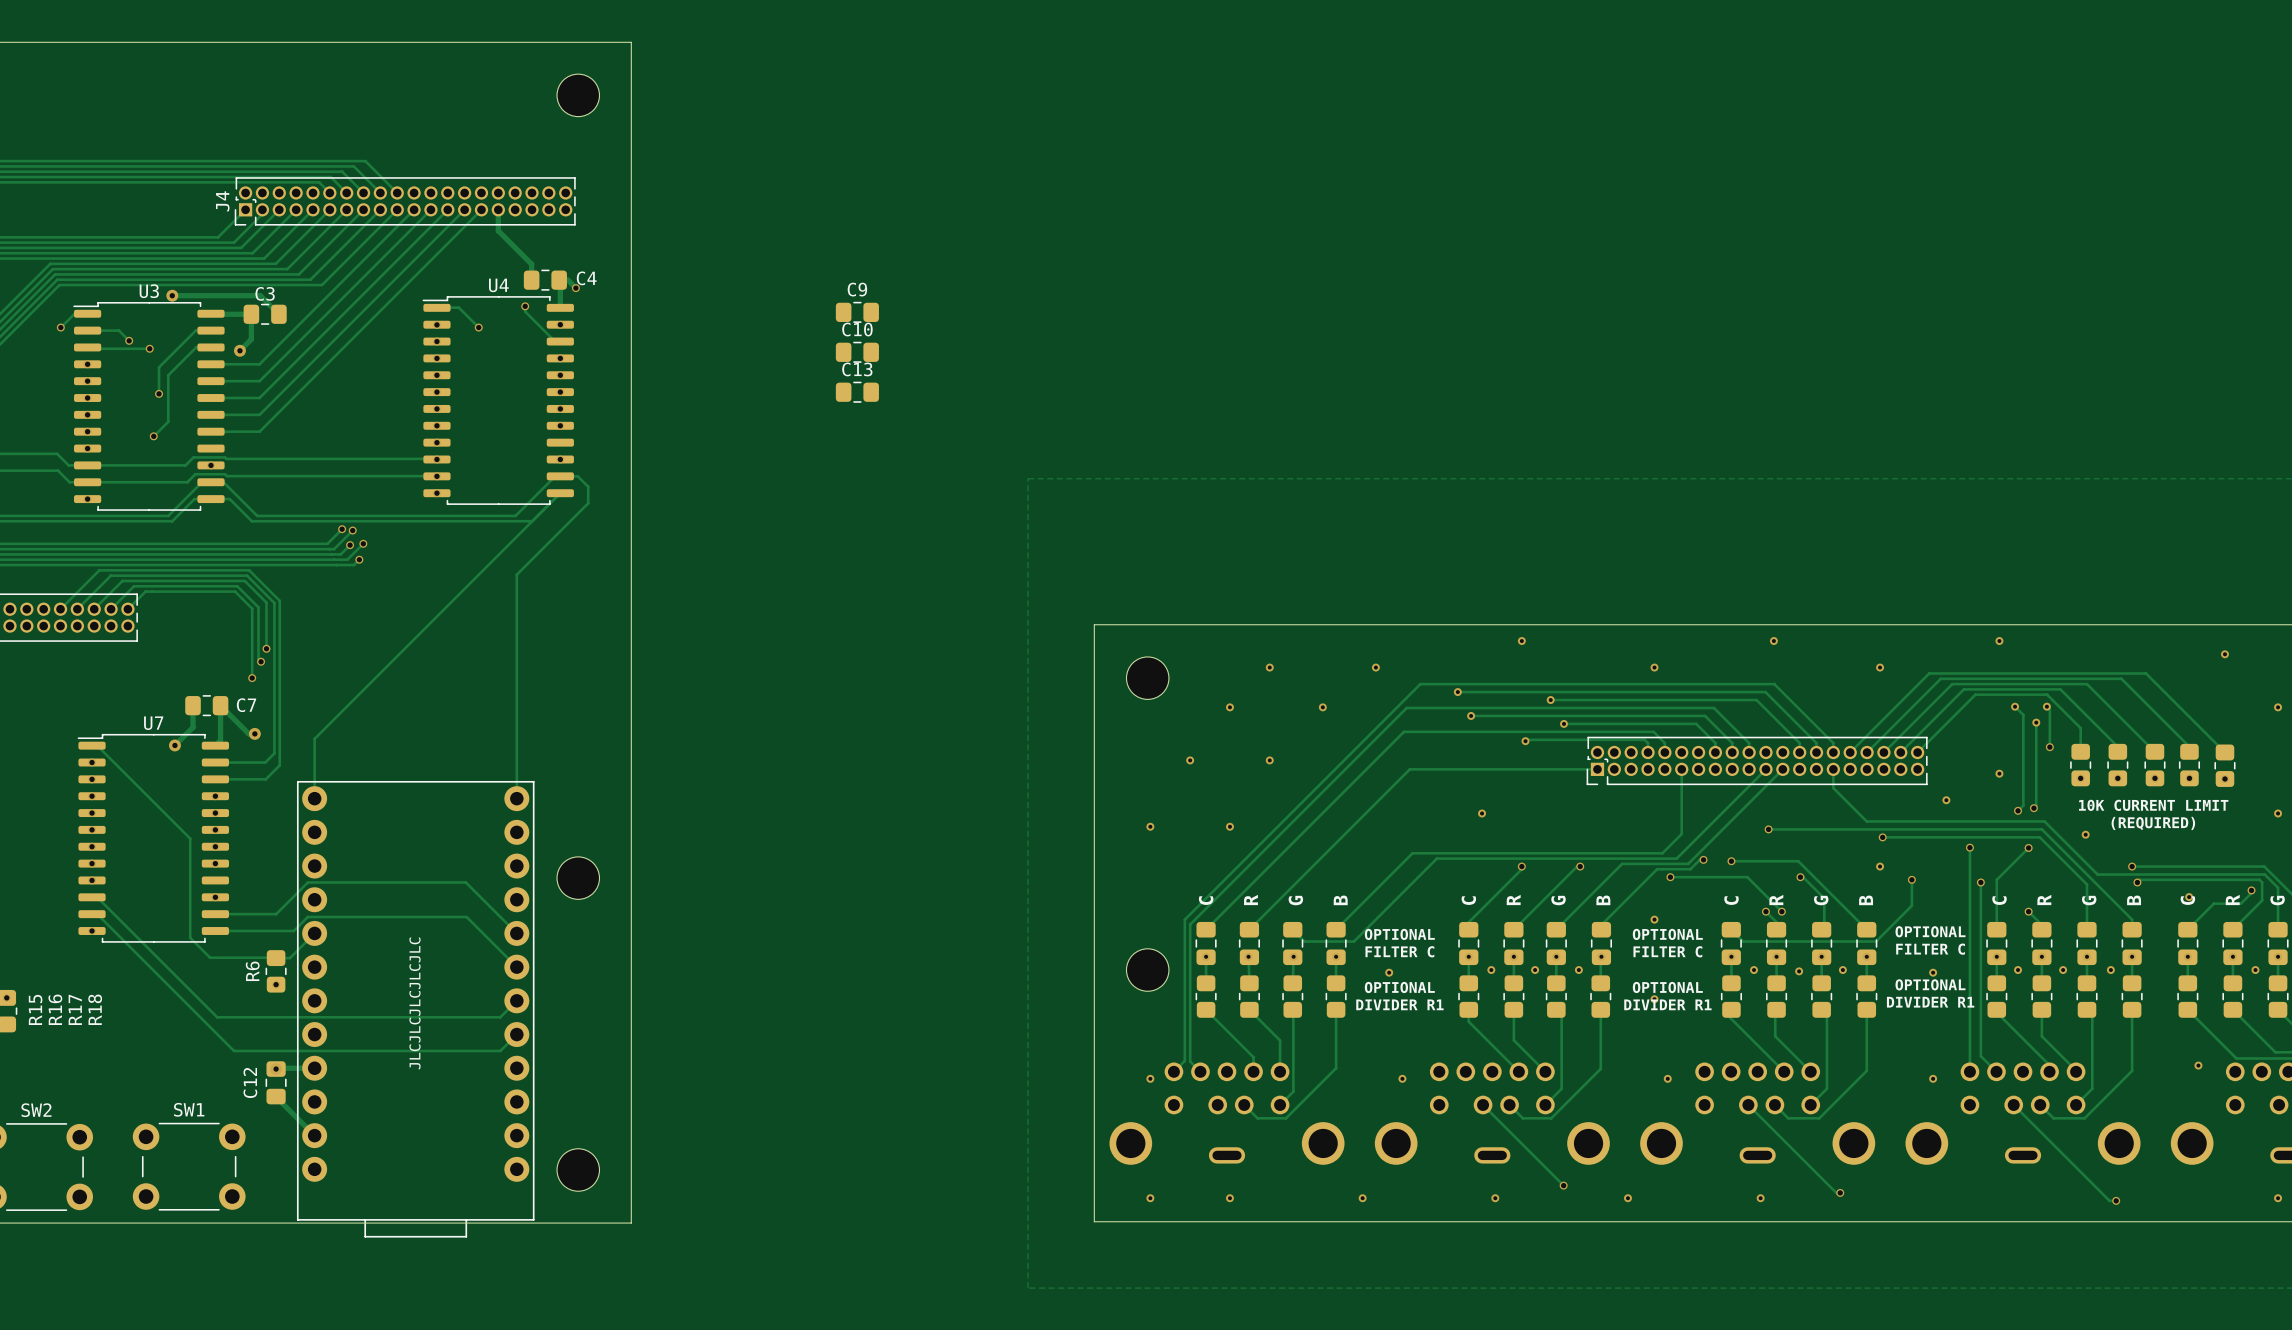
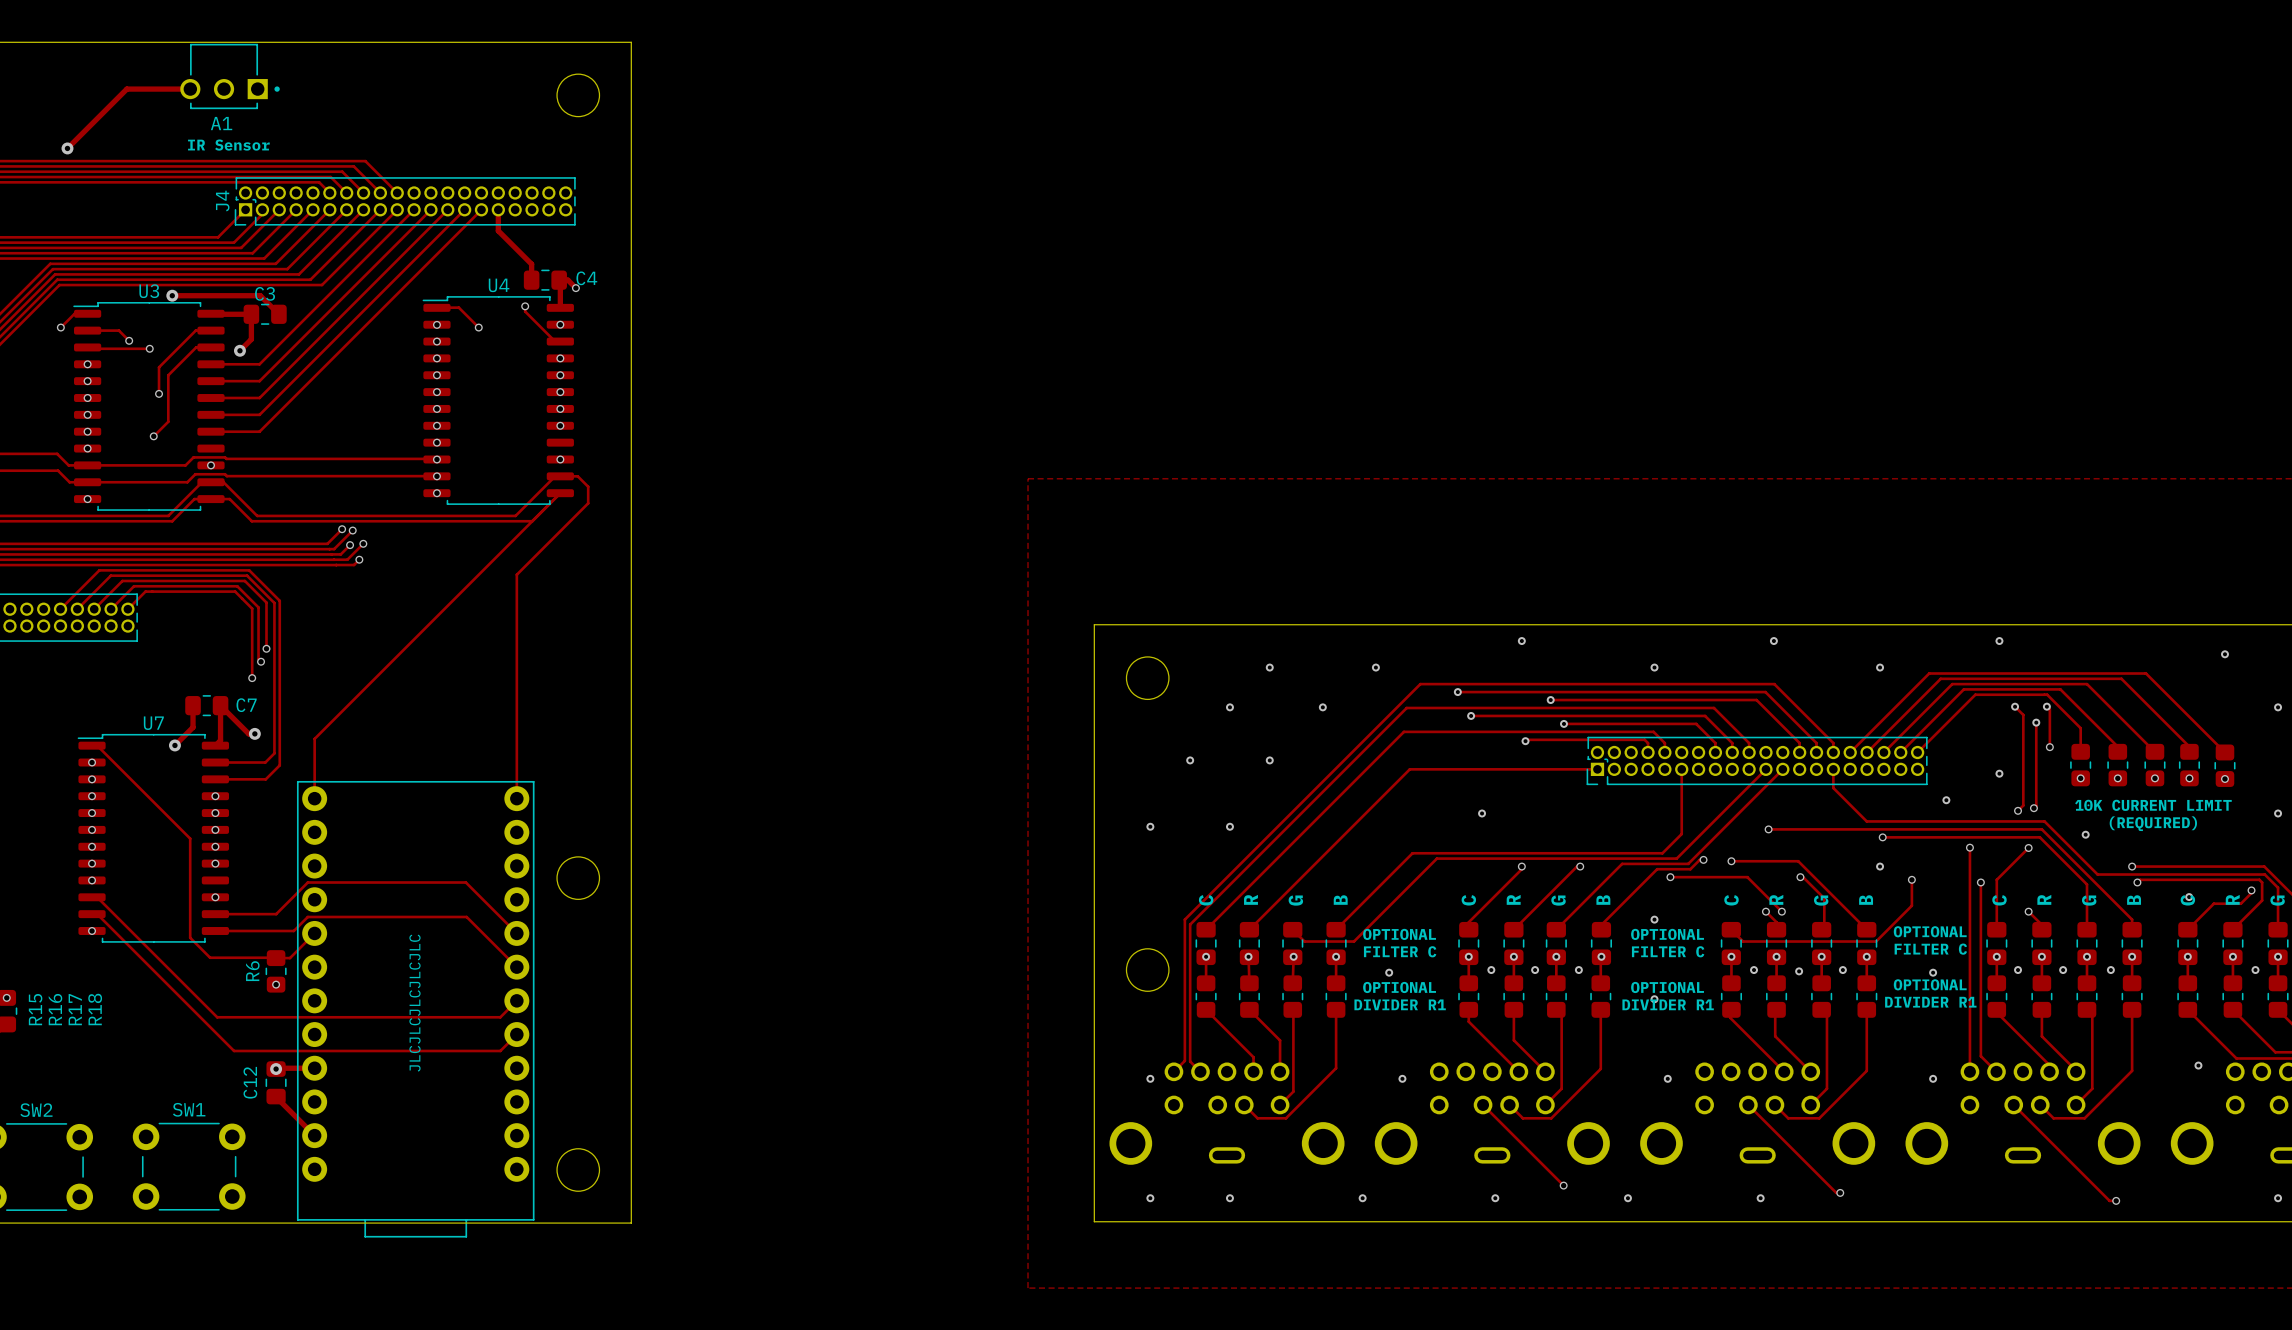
A1: none -> (230, 76)
track: none -> (190, 89) (126, 89) (67, 148)
text: none -> IR Sensor (228, 145)
via: none -> (67, 148)
C9: (857, 312) -> none
C10: (857, 352) -> none
C13: (857, 392) -> none

